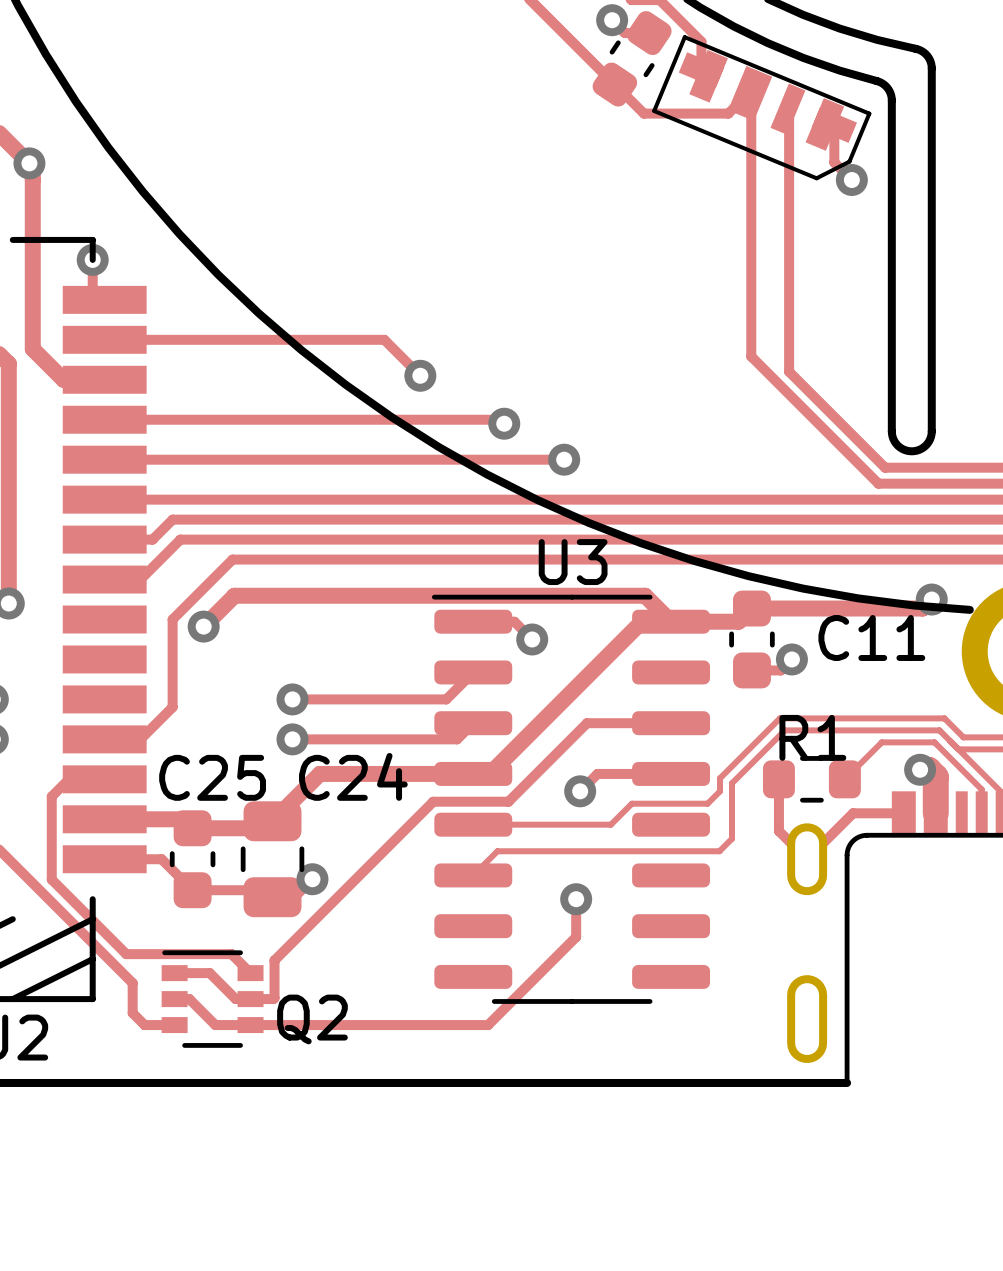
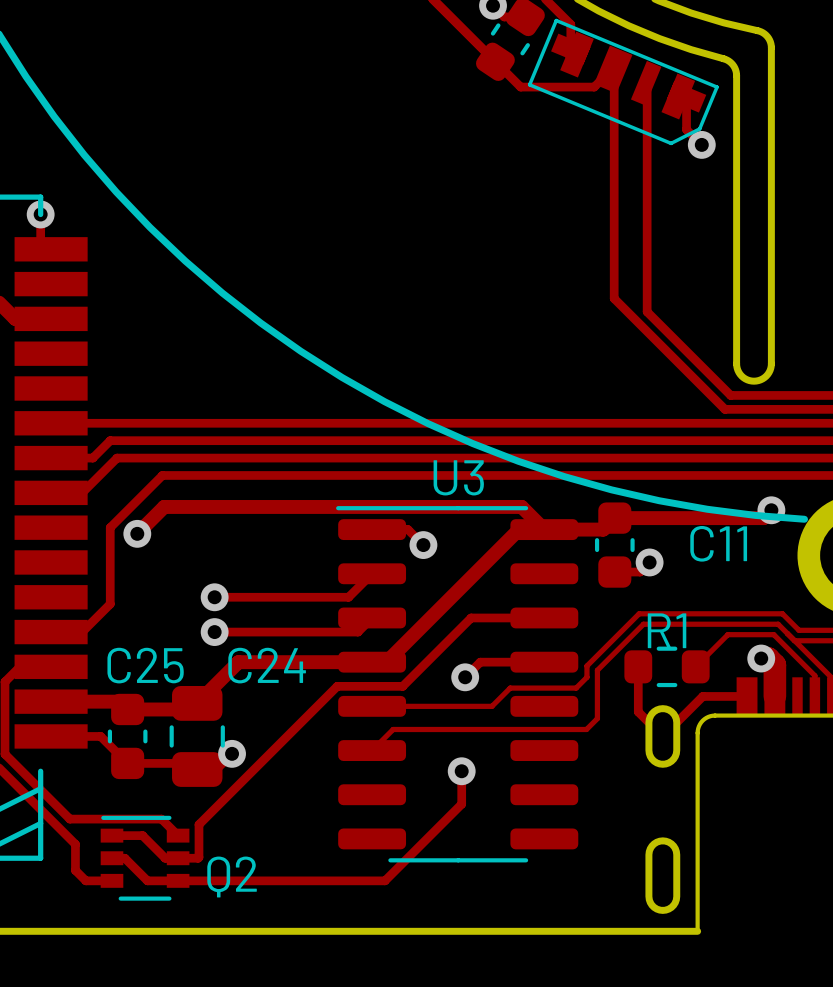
track: (92, 339) (384, 339) (420, 375) -> none
via: (420, 375) -> none
track: (92, 419) (500, 419) (504, 423) -> none
via: (504, 423) -> none
track: (92, 459) (564, 459) -> none
via: (564, 459) -> none

